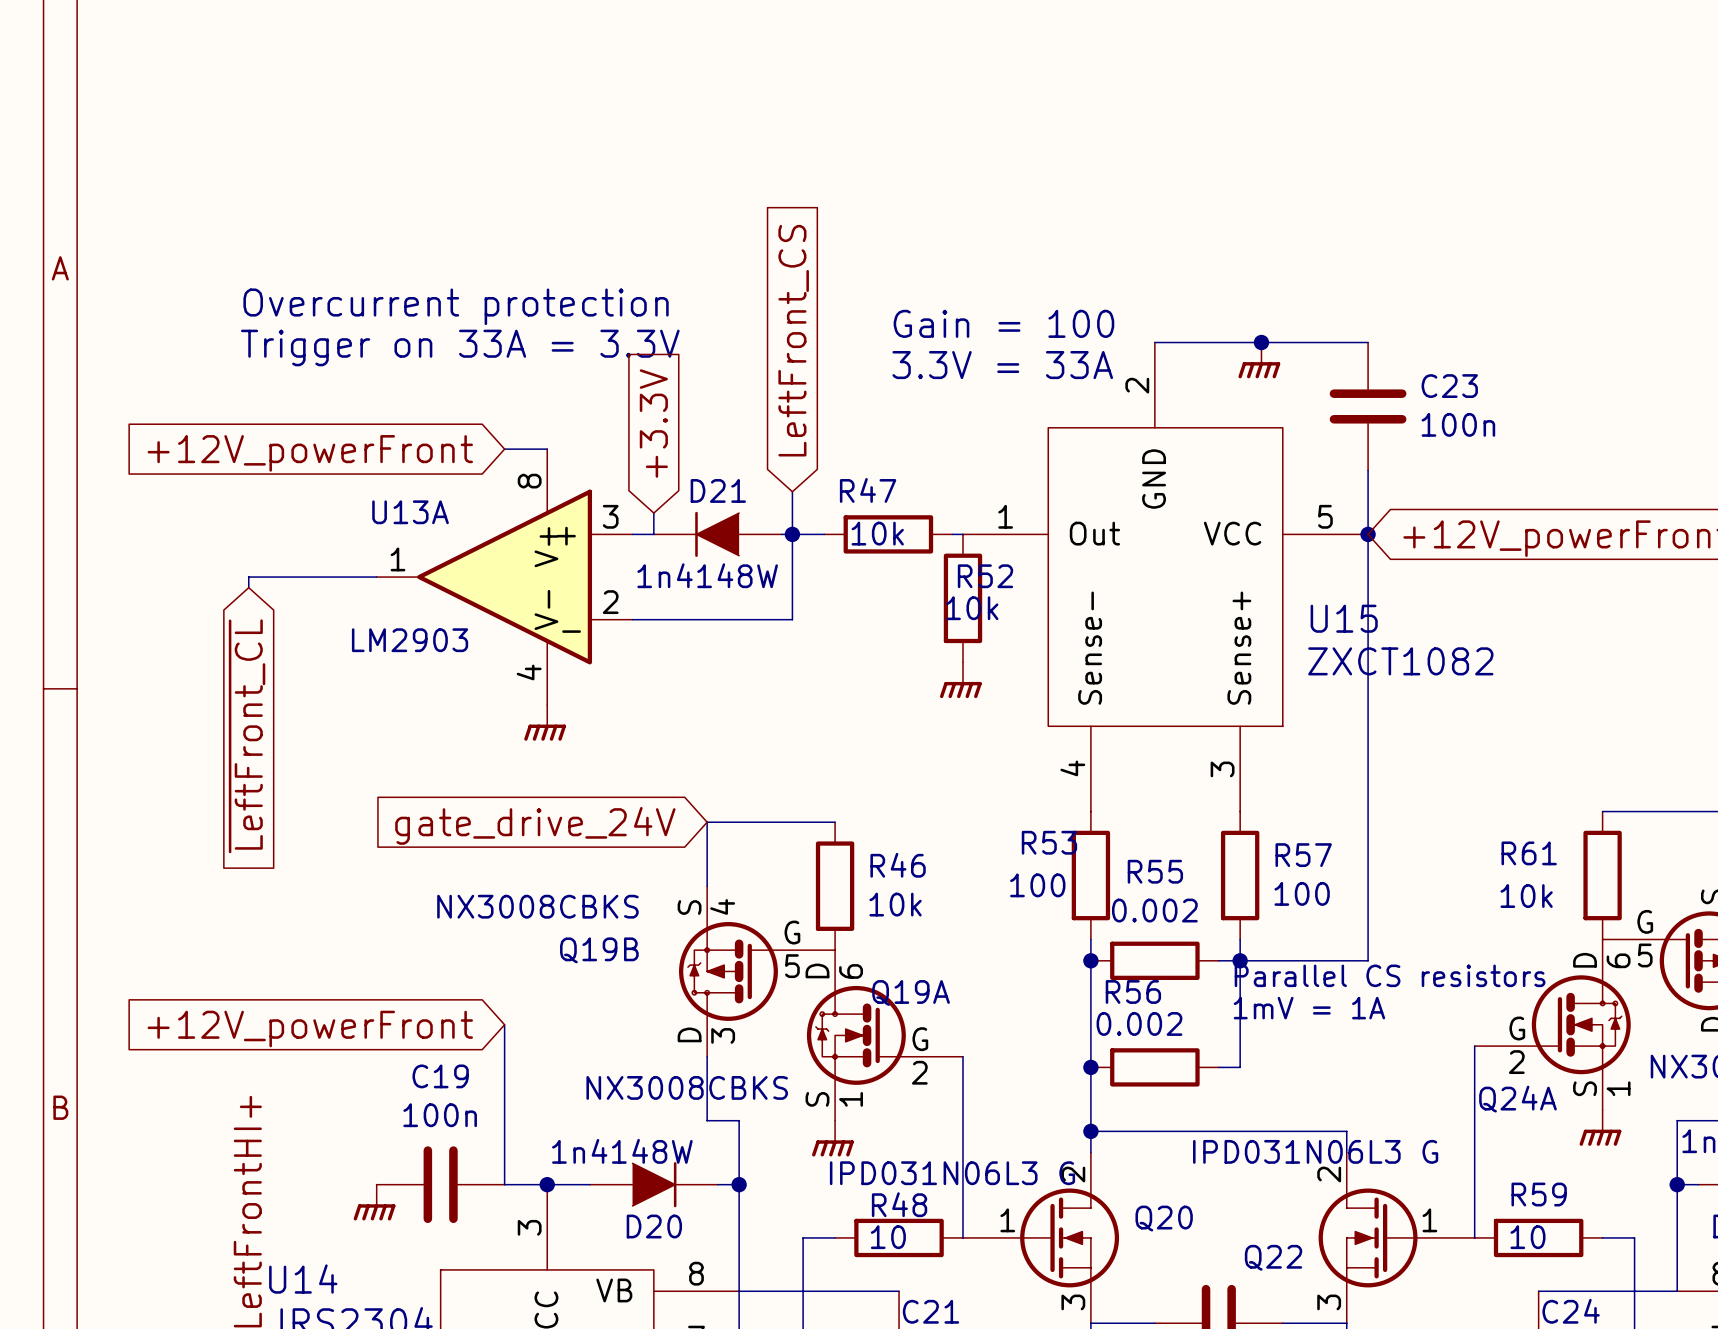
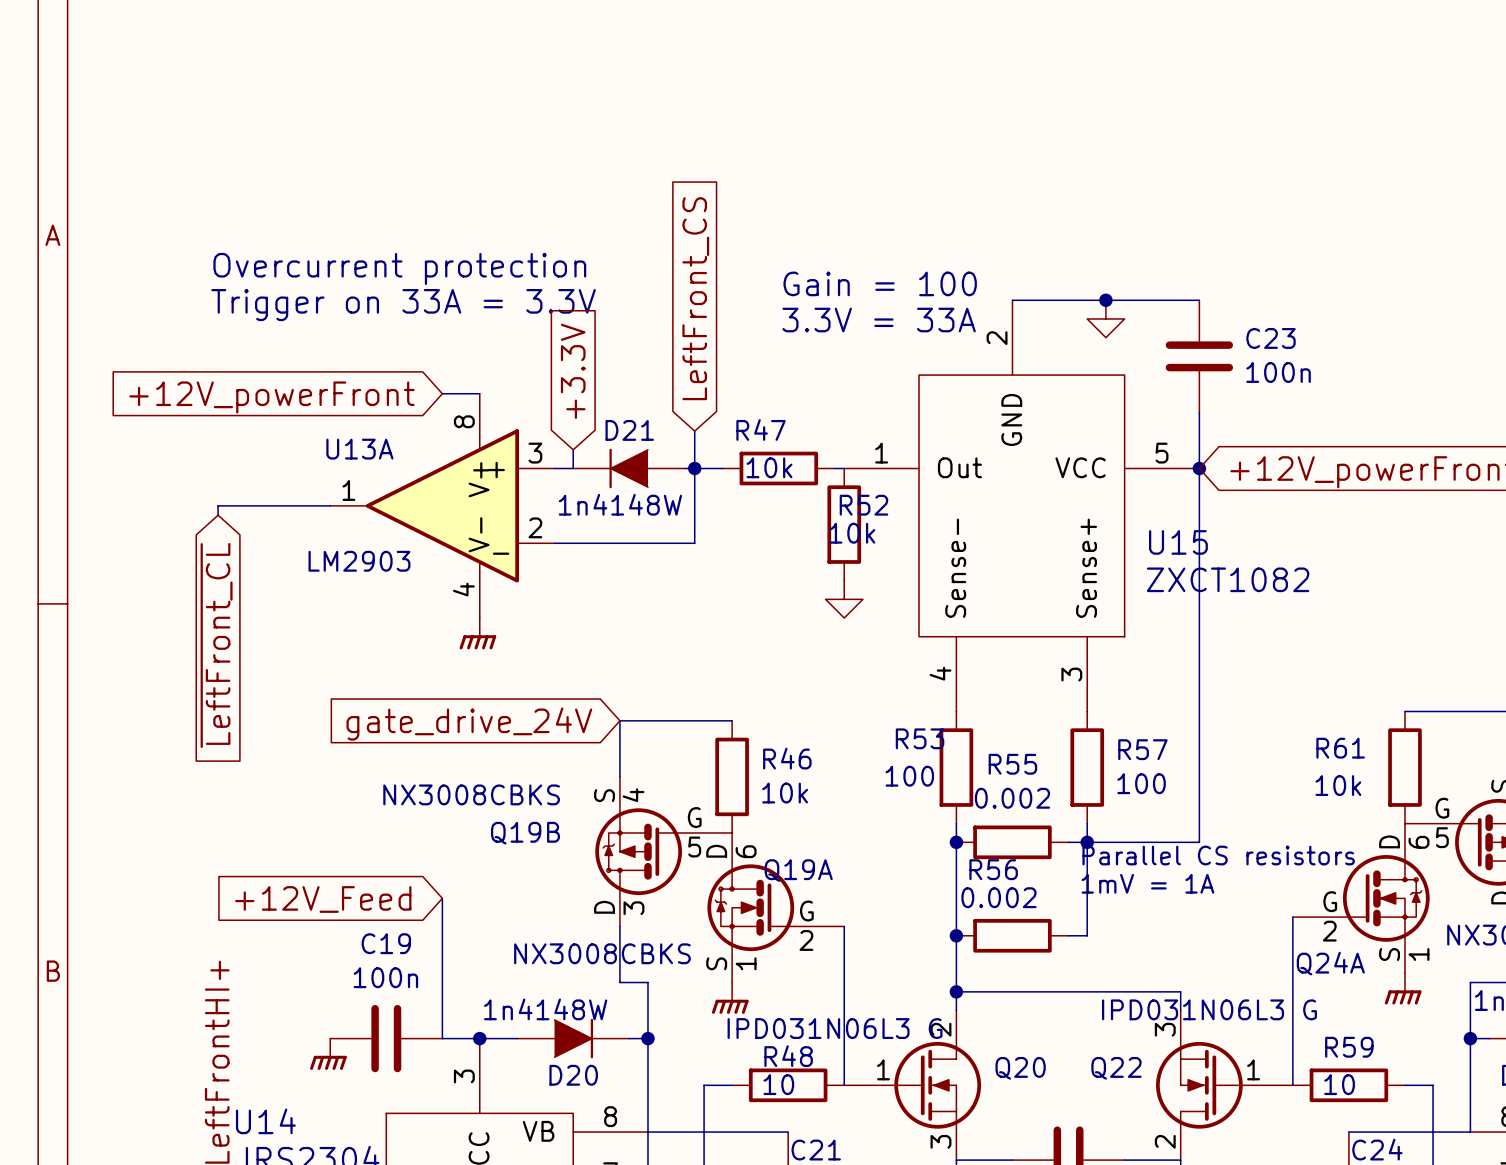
power symbol shape: [1238, 342, 1281, 379] -> [1087, 300, 1125, 338]
power symbol shape: [939, 662, 982, 699] -> [825, 580, 863, 619]
global label: +12V_powerFront (310, 1029) -> +12V_Feed (323, 899)
Q22 value position: IPD031N06L3 G (1315, 1151) -> IPD031N06L3 G (1209, 1009)
Q22 flip: as is (1368, 1237) -> up-down (1199, 1085)

